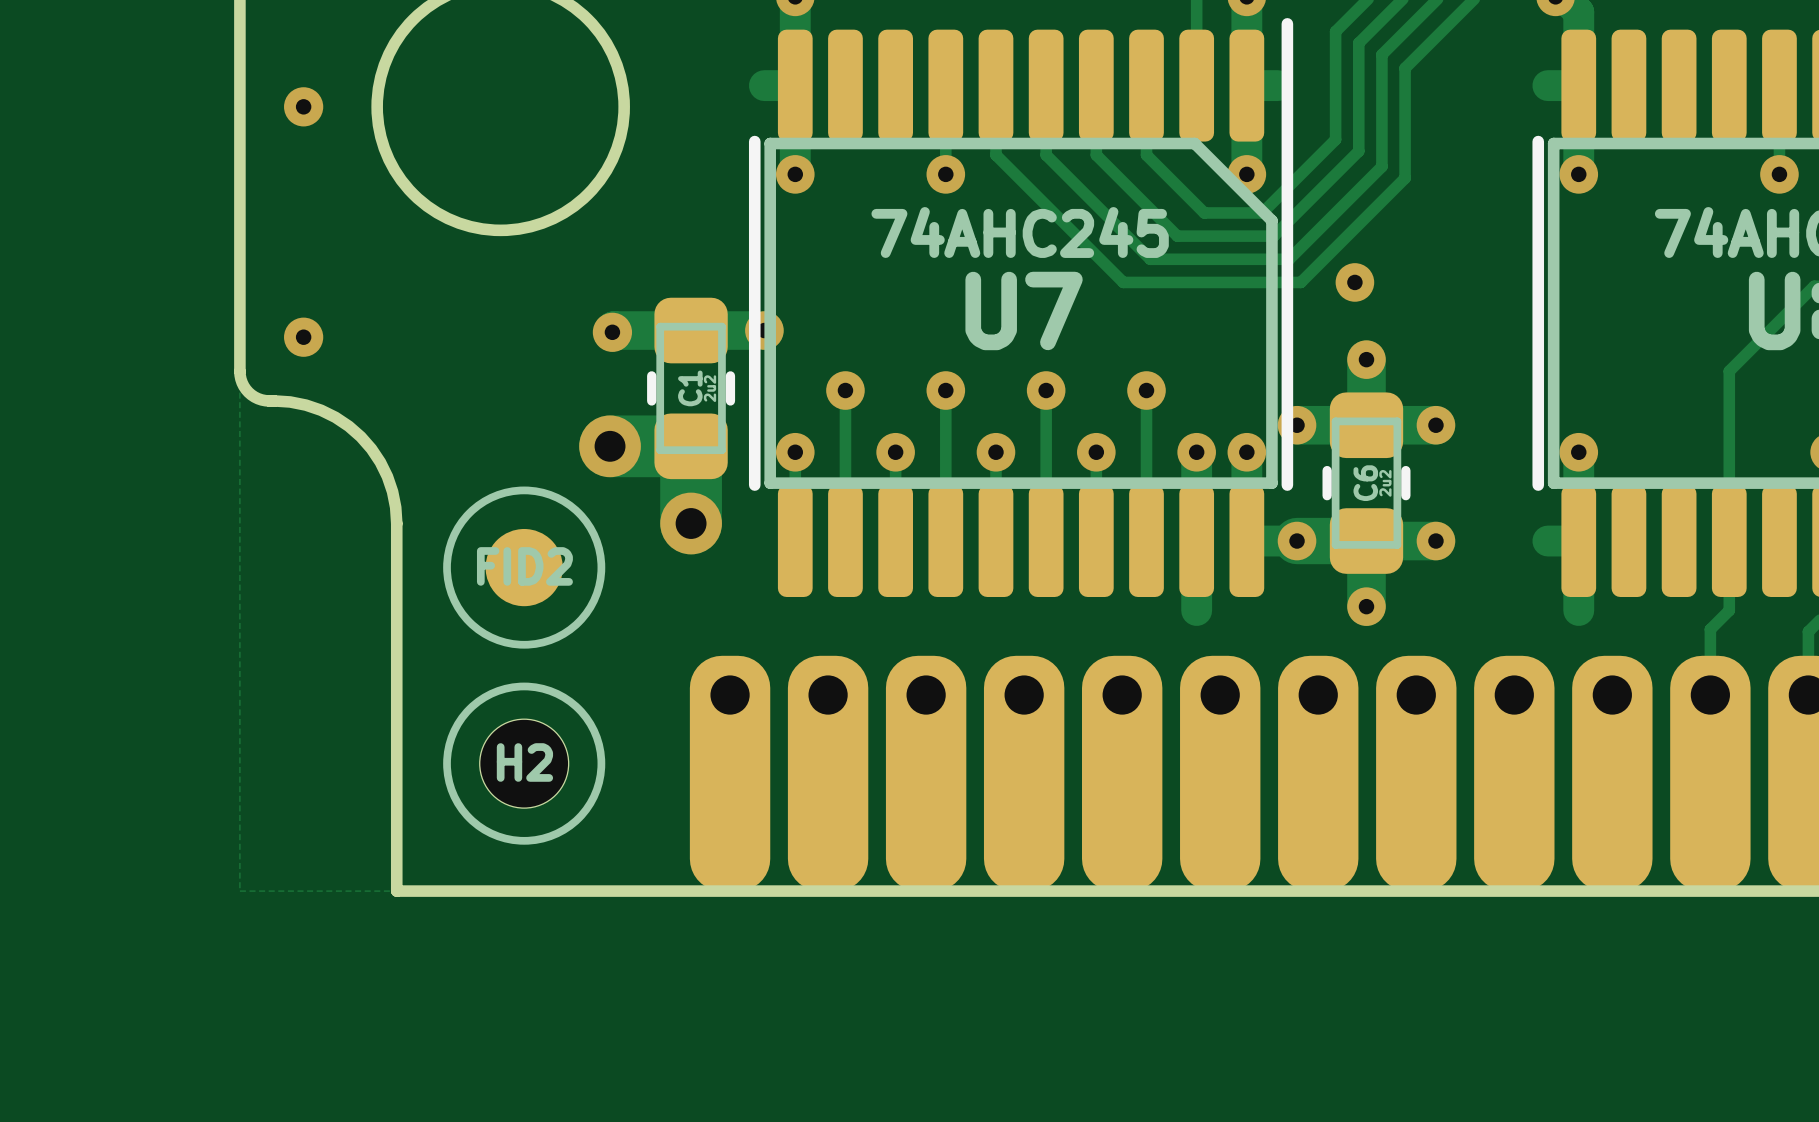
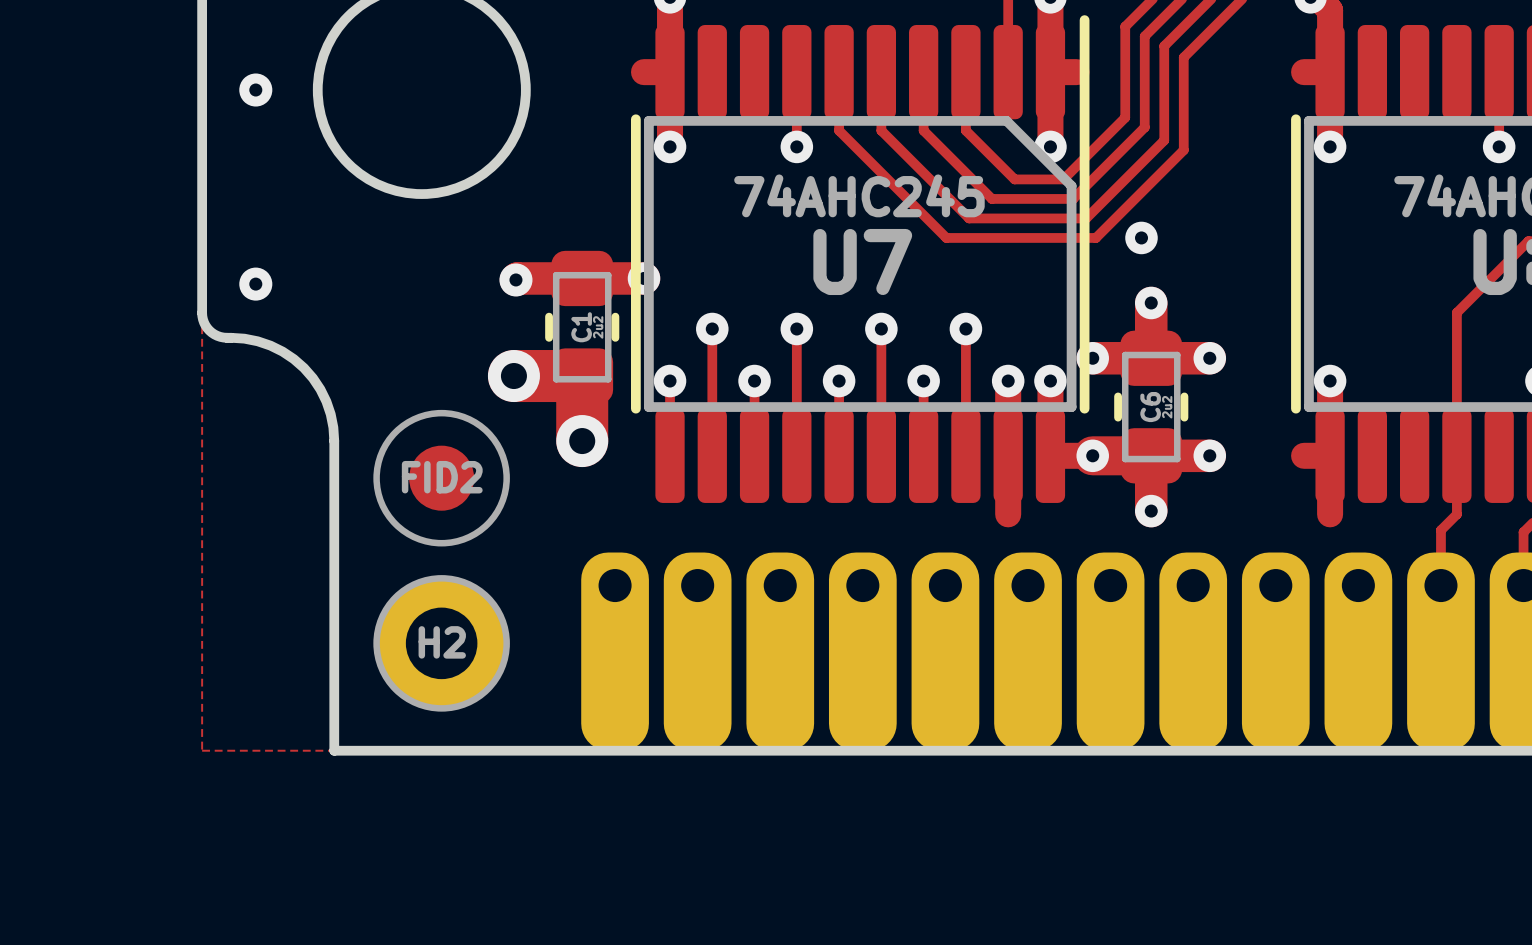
H2 footprint: [443, 682, 606, 845] -> [373, 575, 510, 712]

